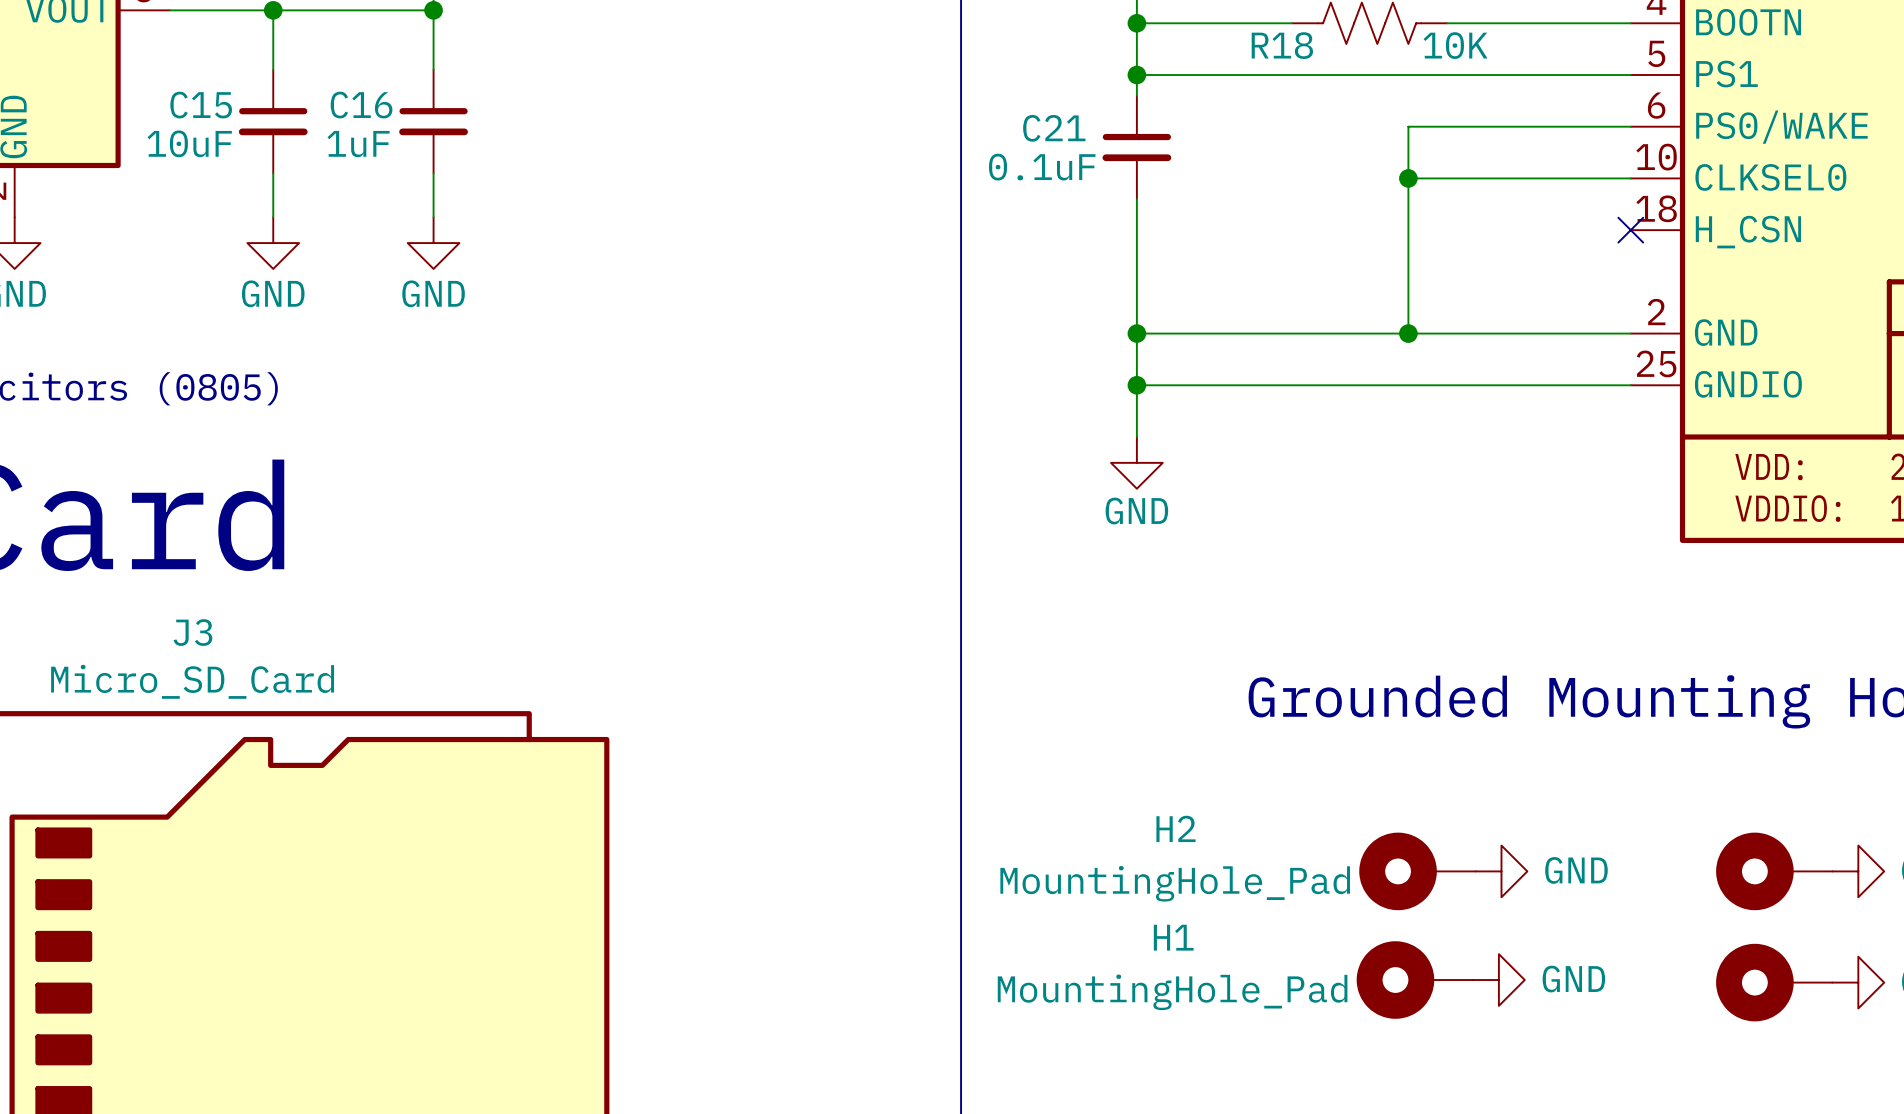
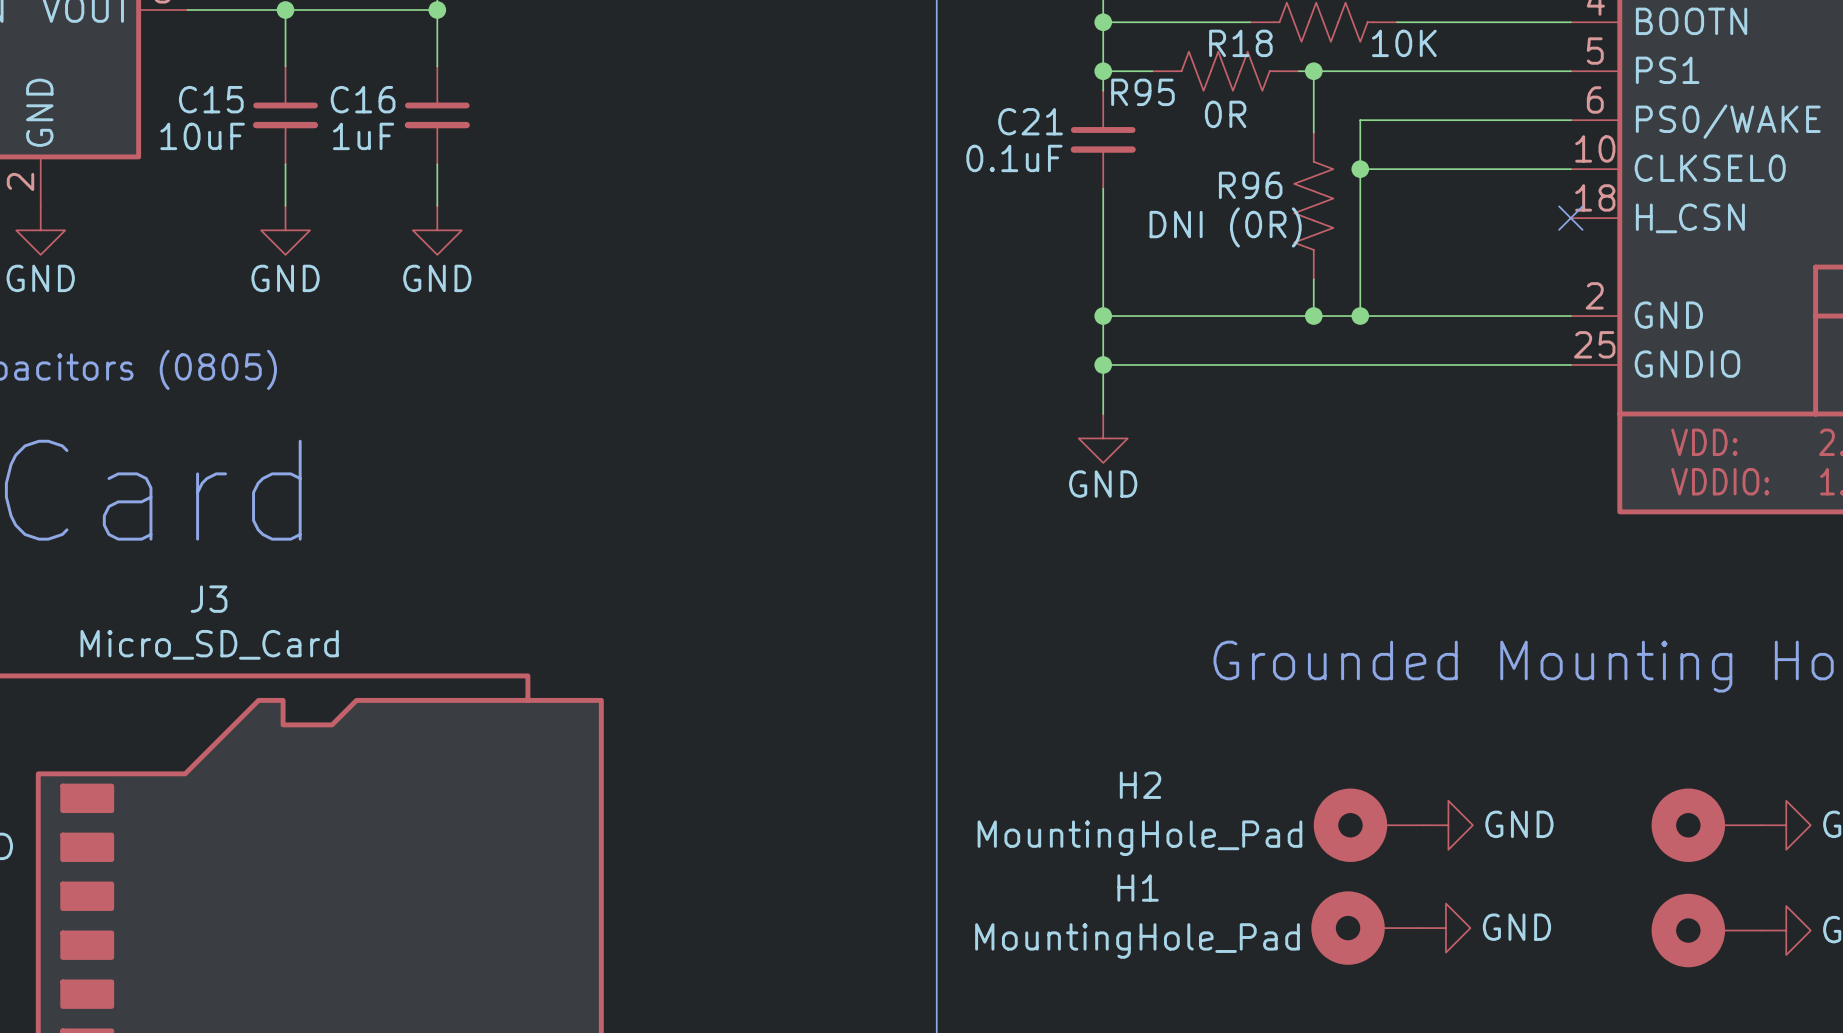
wire: (1188, 74) (1343, 74) -> none
R95: none -> 0R (1225, 71)
wire: none -> (1313, 71) (1313, 132)
junction: none -> (1313, 71)
R96: none -> DNI (0R) (1313, 205)
wire: none -> (1313, 279) (1313, 316)
junction: none -> (1313, 316)

